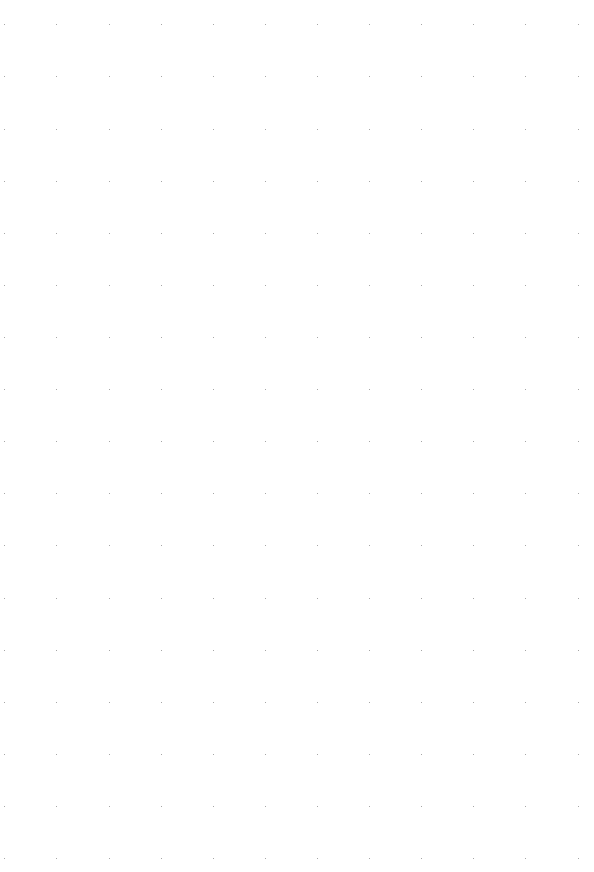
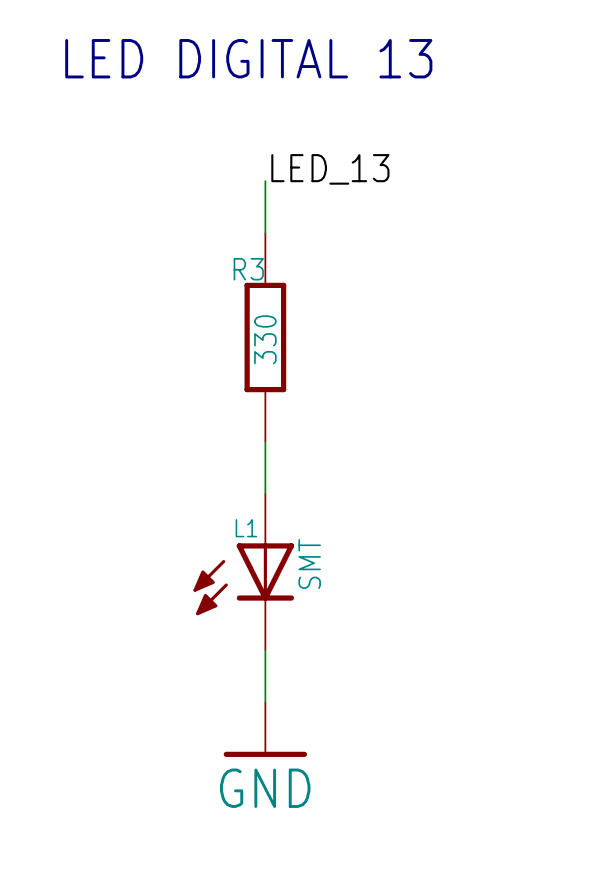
text: none -> LED DIGITAL 13 (248, 58)
label: none -> LED_13 (330, 169)
wire: none -> (265, 181) (265, 233)
R3: none -> 330 (265, 337)
wire: none -> (265, 441) (265, 493)
L1: none -> SMT (243, 571)
wire: none -> (265, 650) (265, 702)
power symbol: none -> GND (265, 729)

